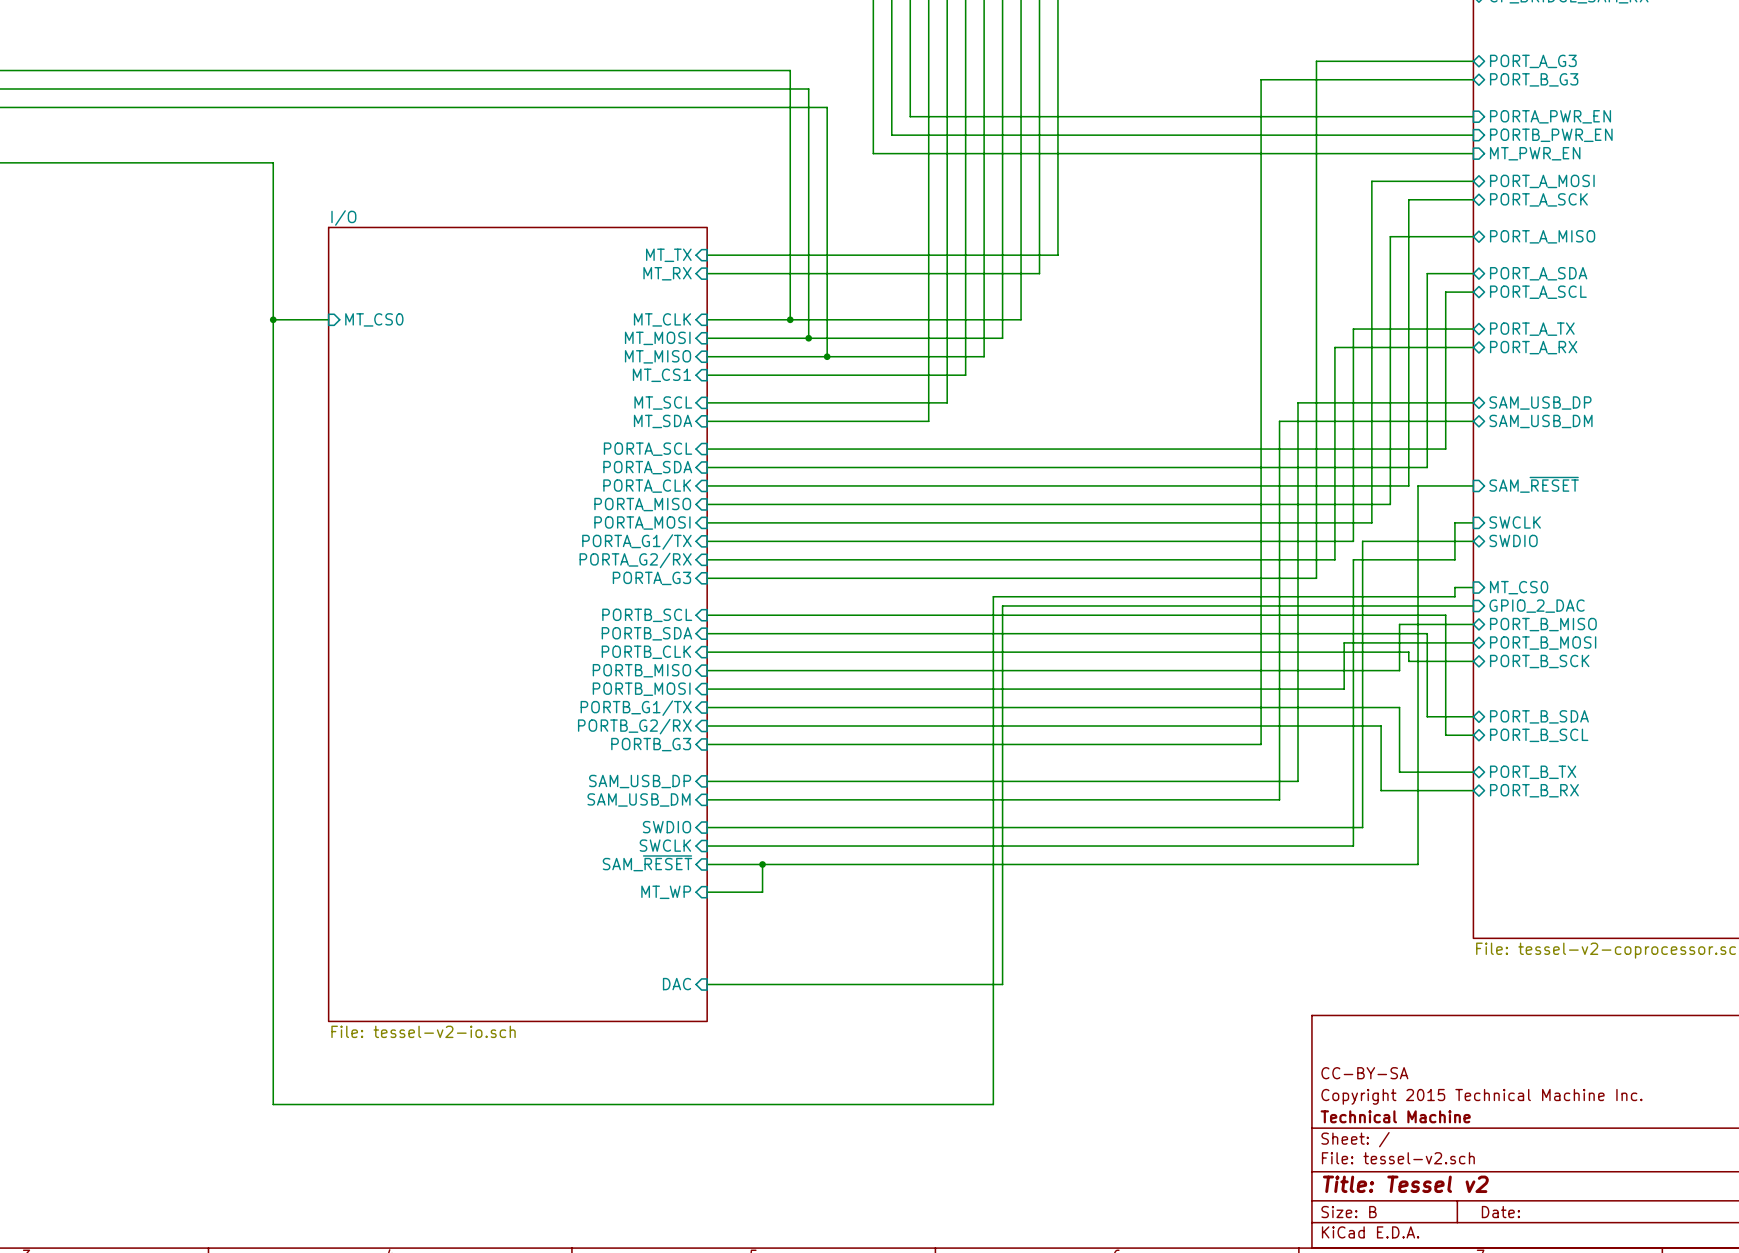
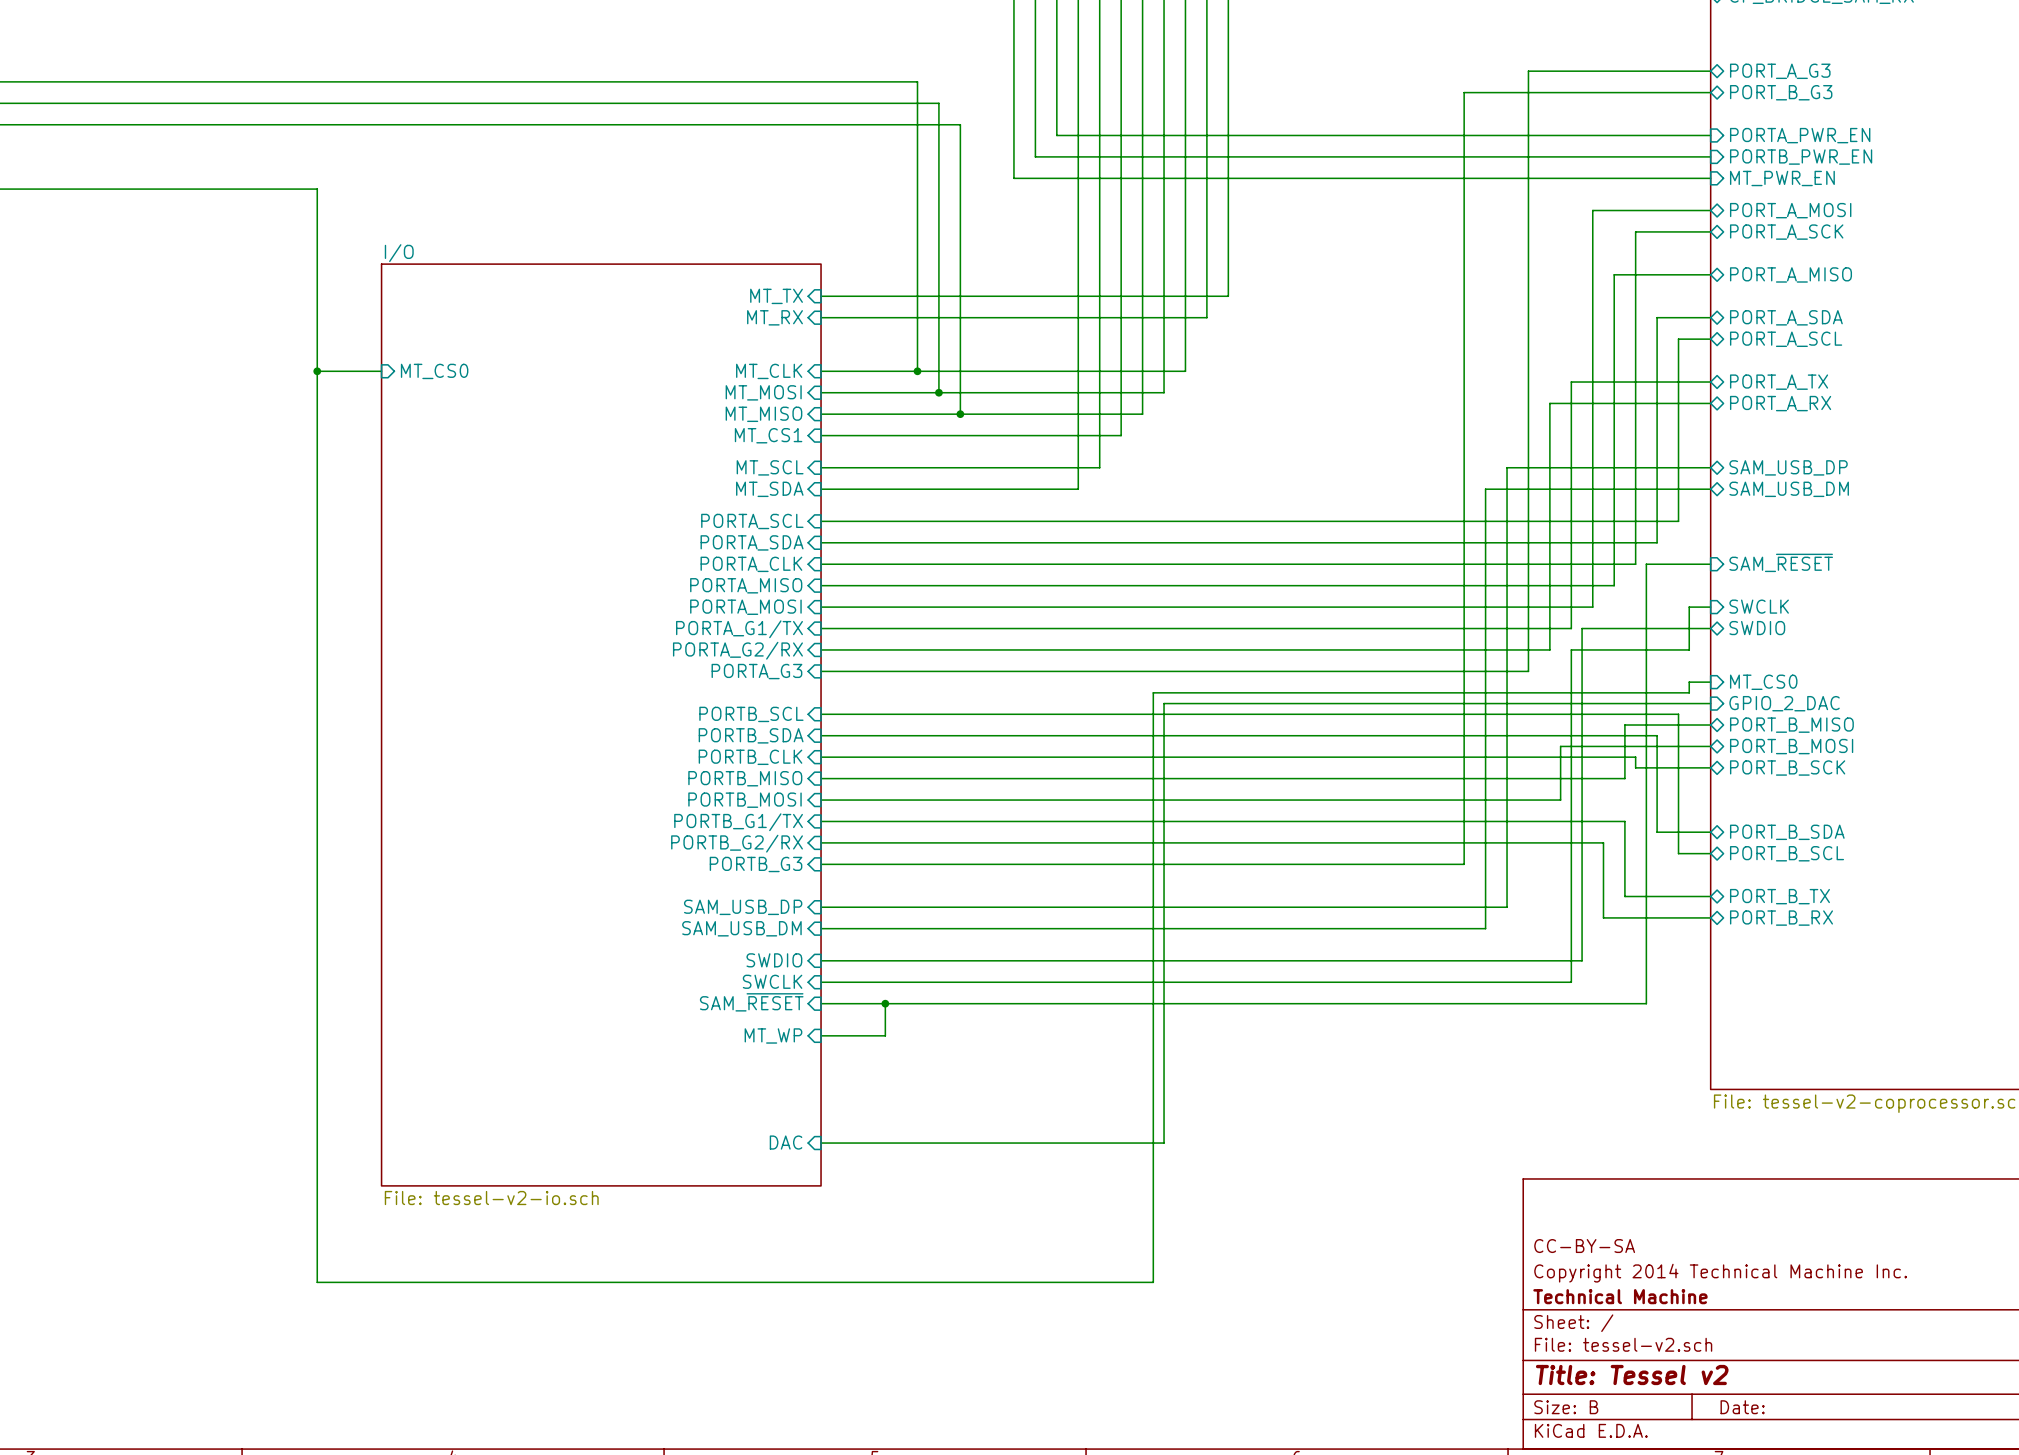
title block: Copyright 2015 Technical Machine Inc. (1481, 1096) -> Copyright 2014 Technical Machine Inc. (1720, 1273)

